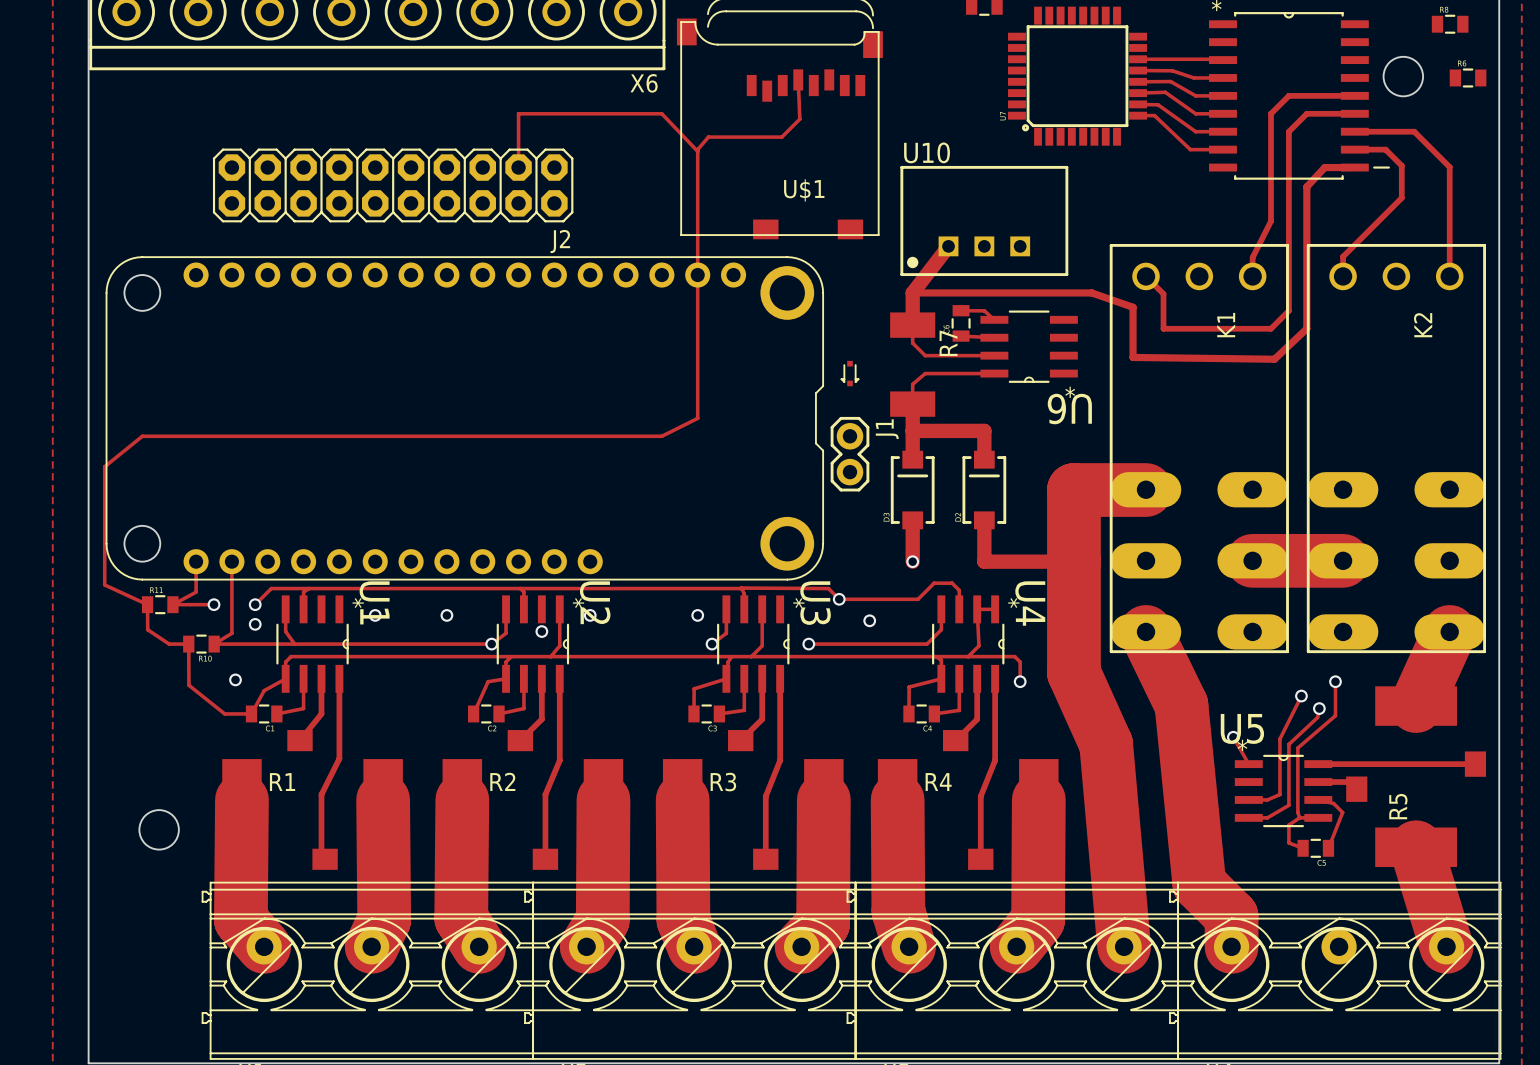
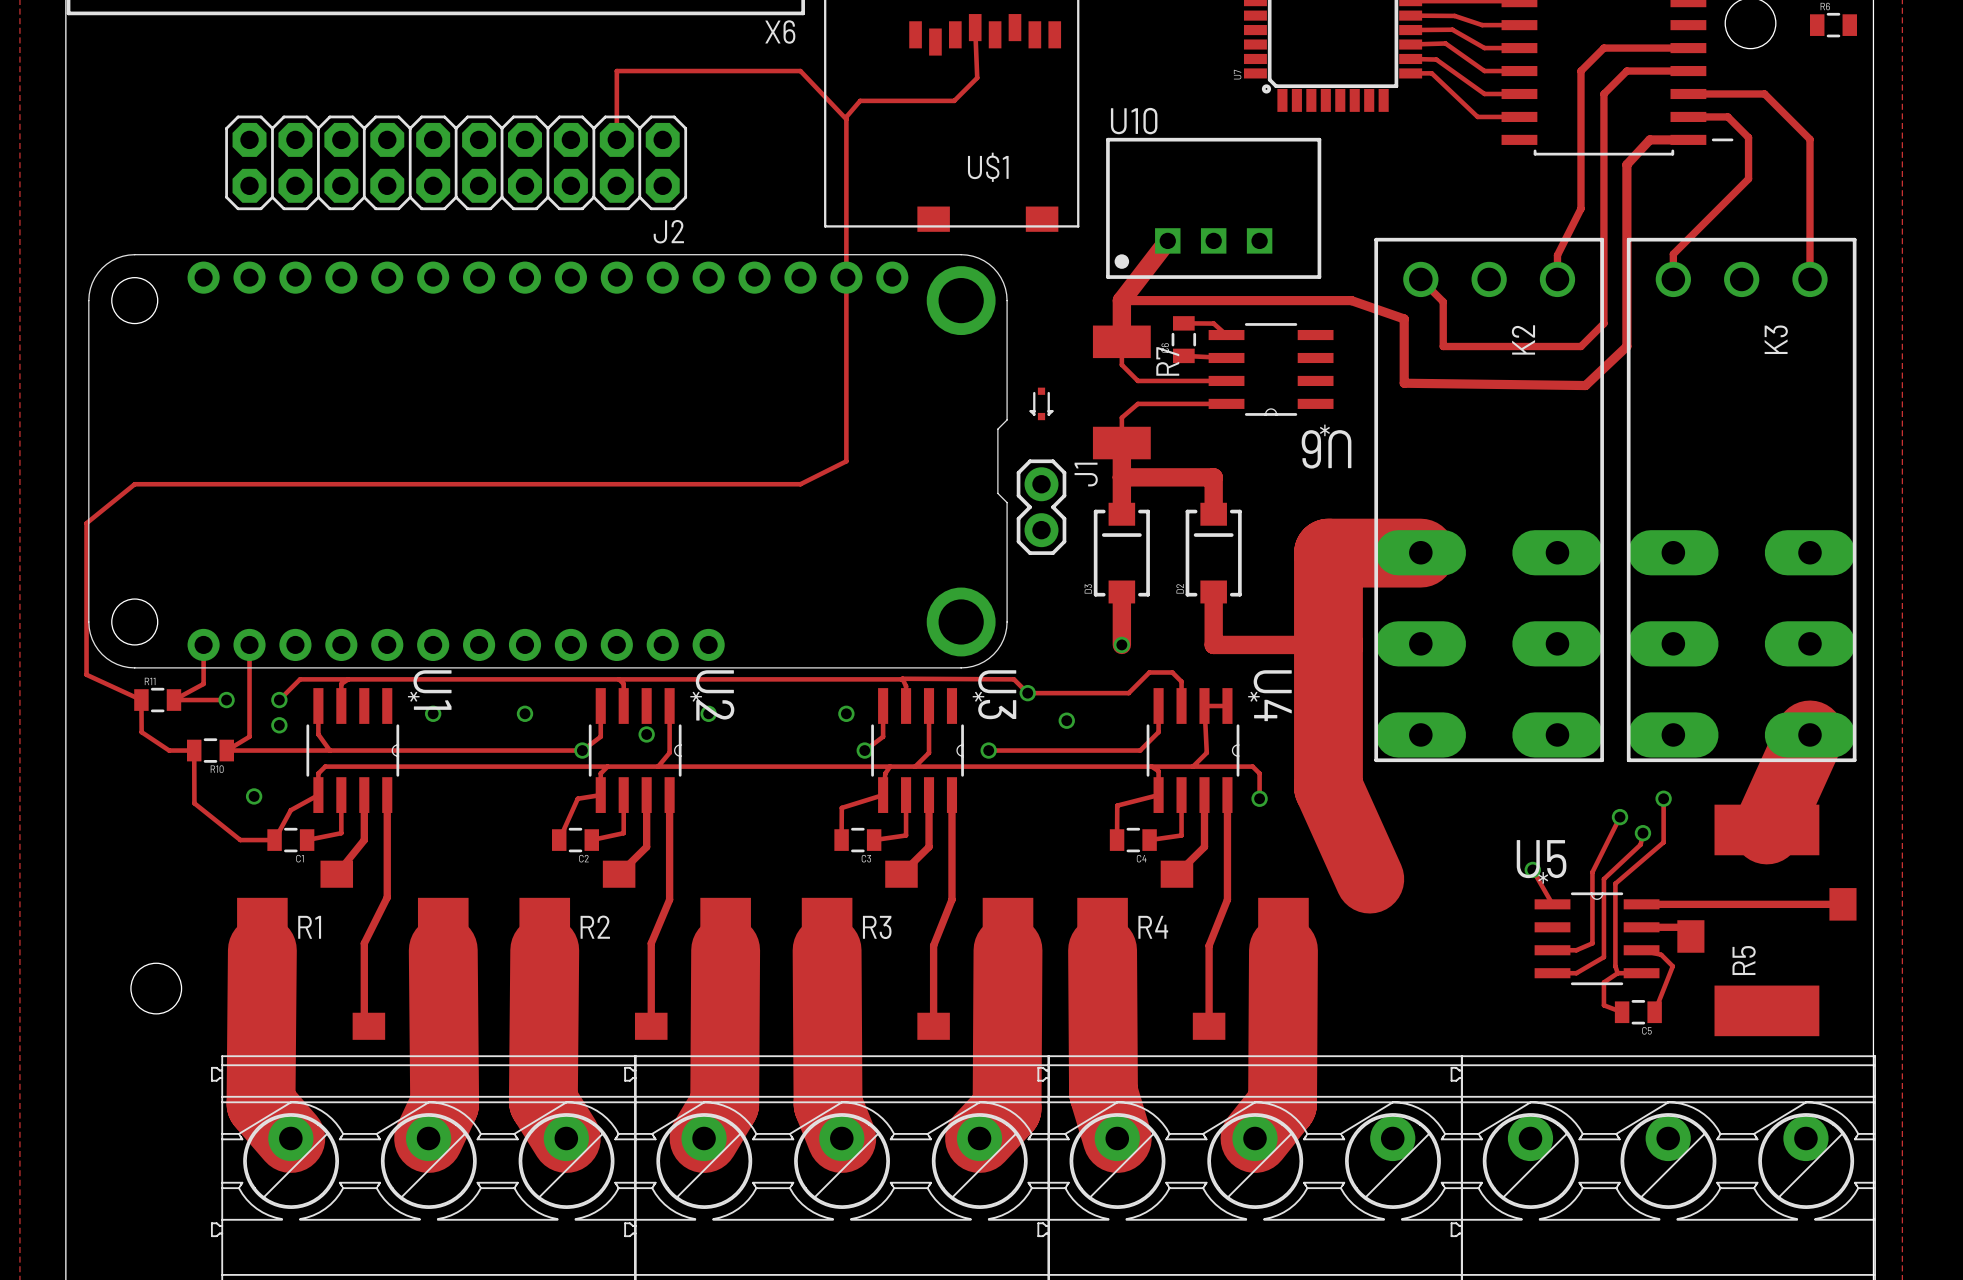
K1 name: K1 (1226, 325) -> K2 (1523, 339)
K2 name: K2 (1423, 325) -> K3 (1776, 339)
track: (1252, 560) (1343, 560) -> none
track: (1146, 631) (1181, 705) (1199, 884) (1231, 916) (1231, 946) -> none
track: (1106, 744) (1124, 946) -> none
track: (1416, 847) (1446, 946) -> none

